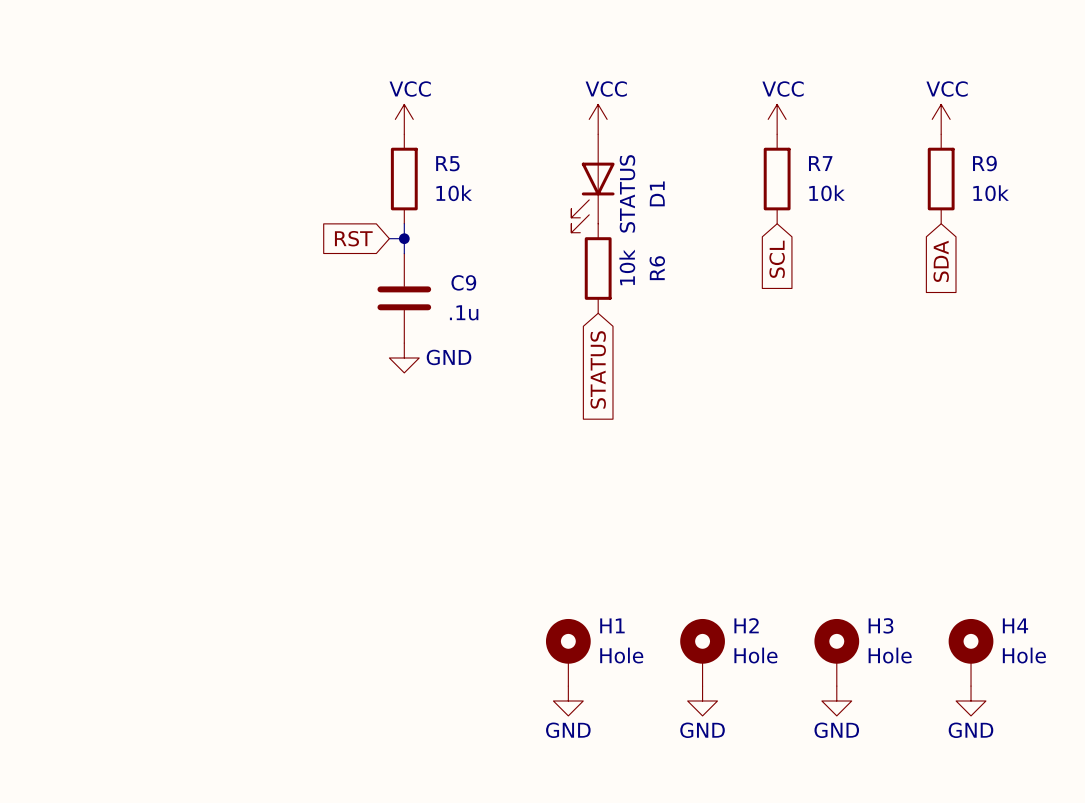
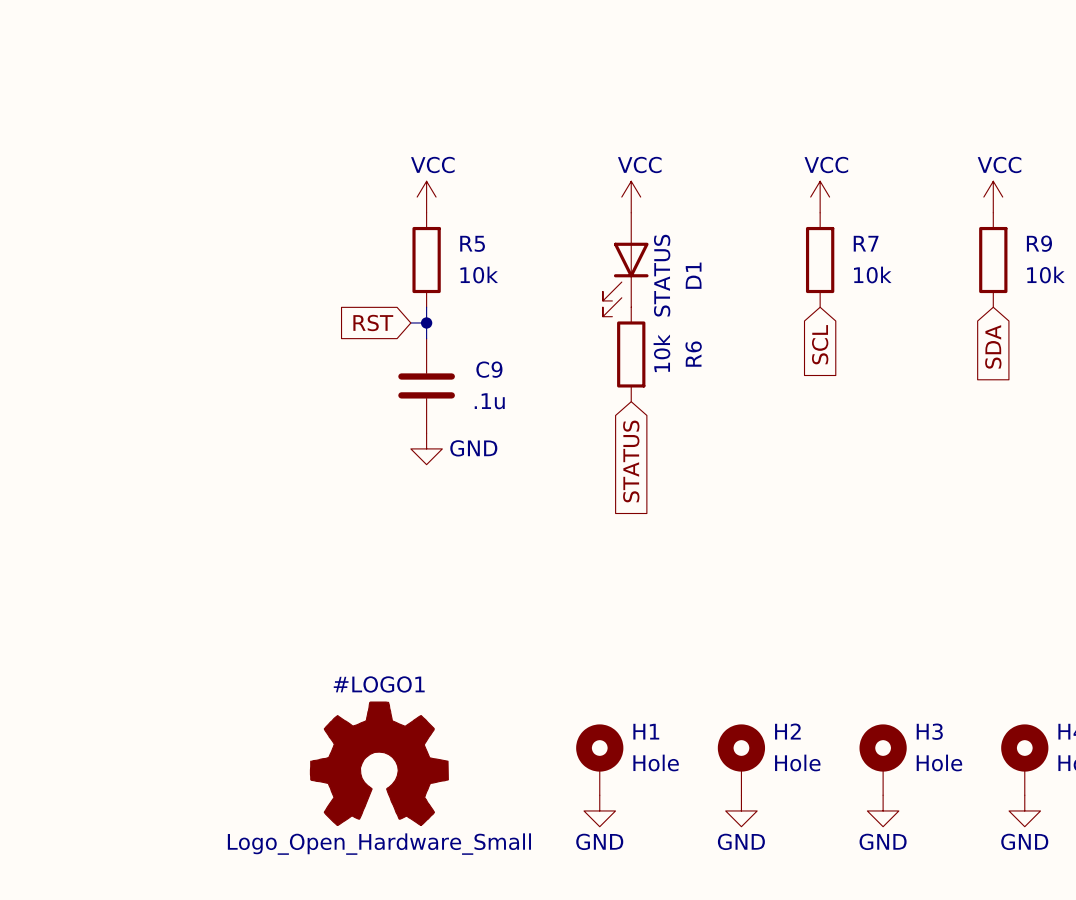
#LOGO1: none -> Logo_Open_Hardware_Small (379, 763)

